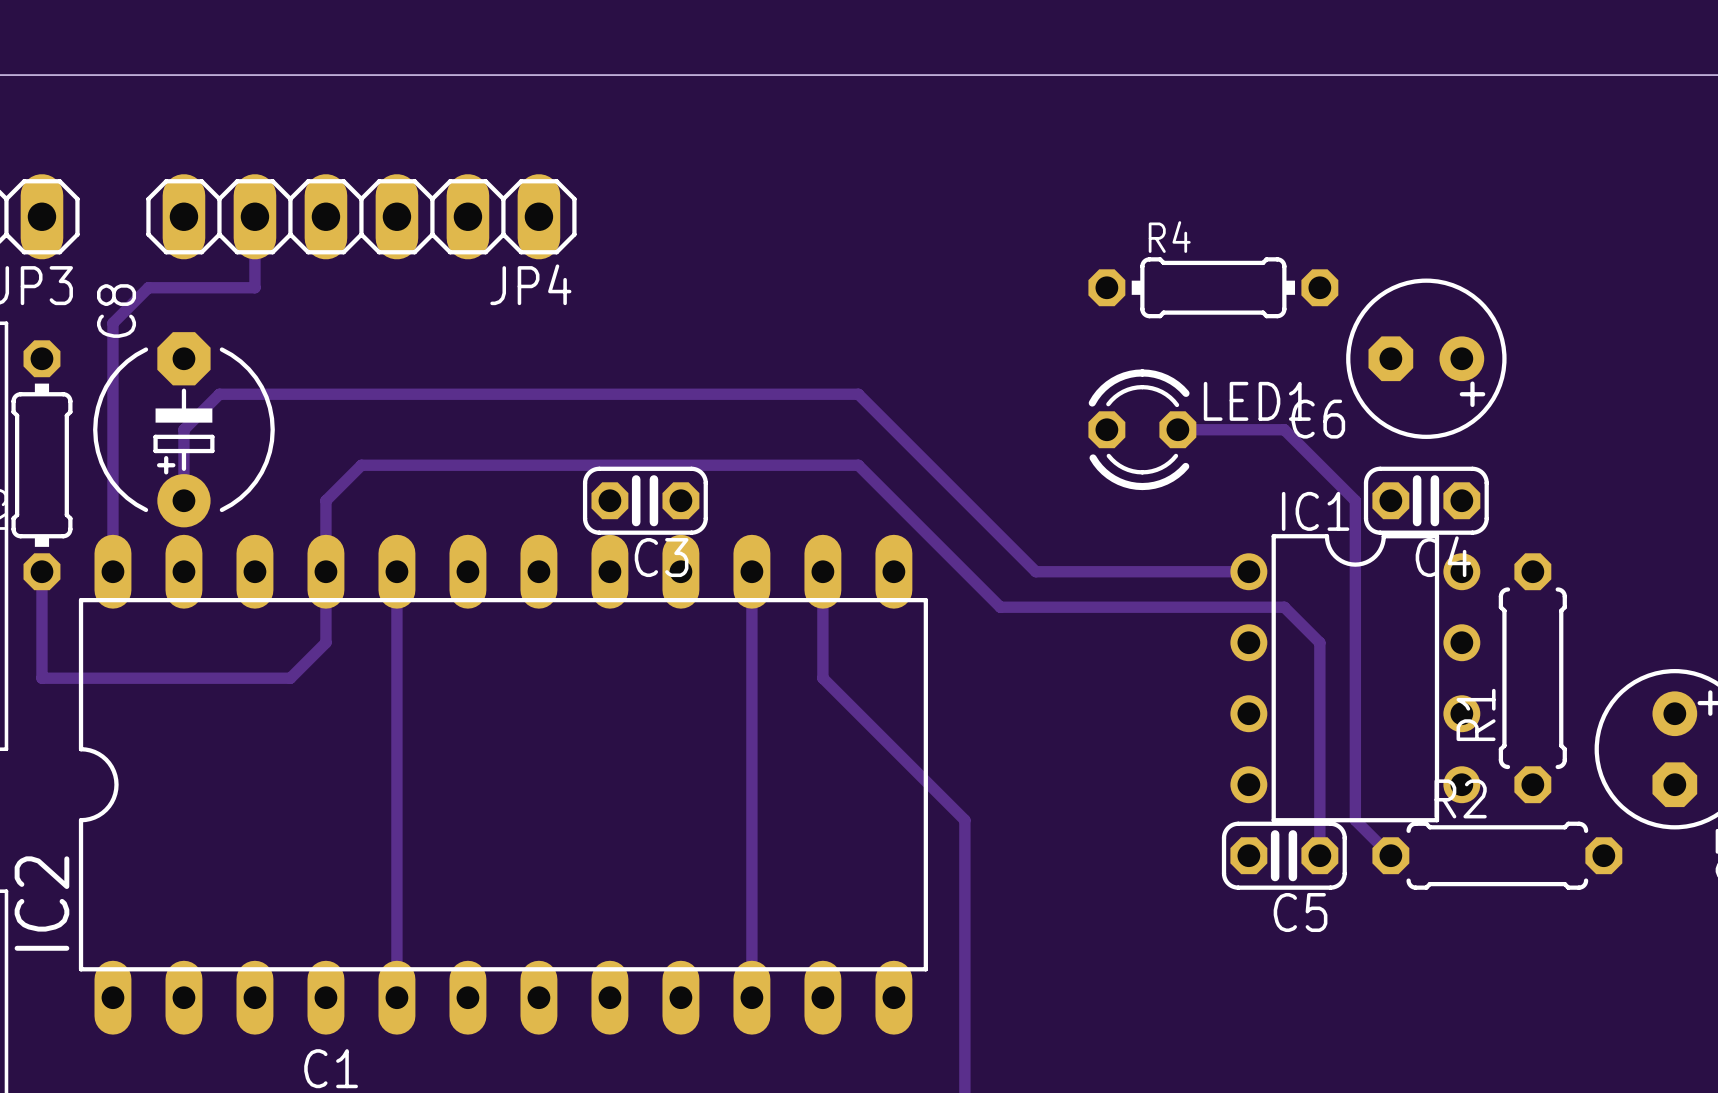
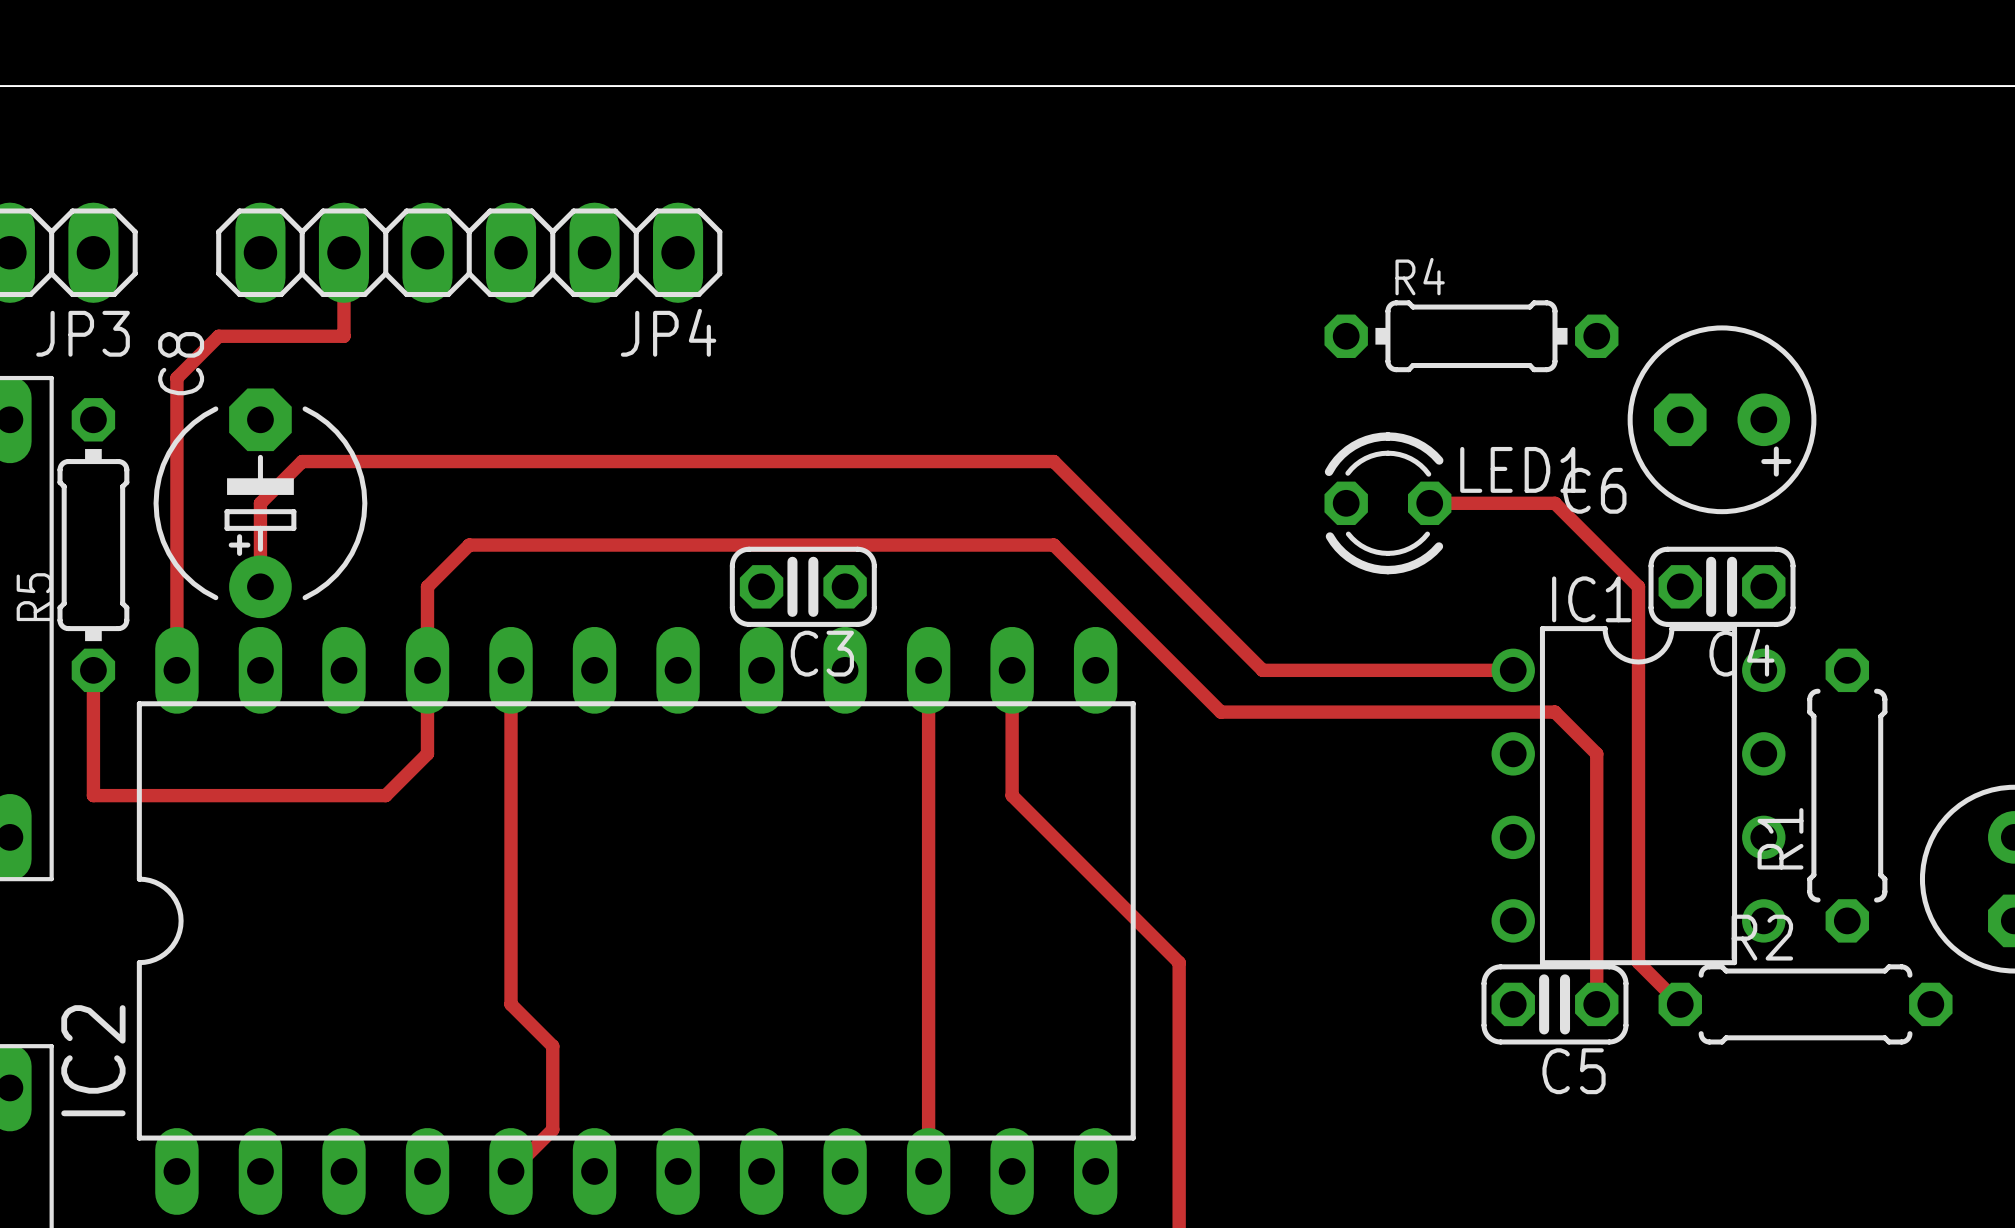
track: (396, 855) (396, 997) -> (511, 1004) (552, 1046) (552, 1129) (511, 1171)

